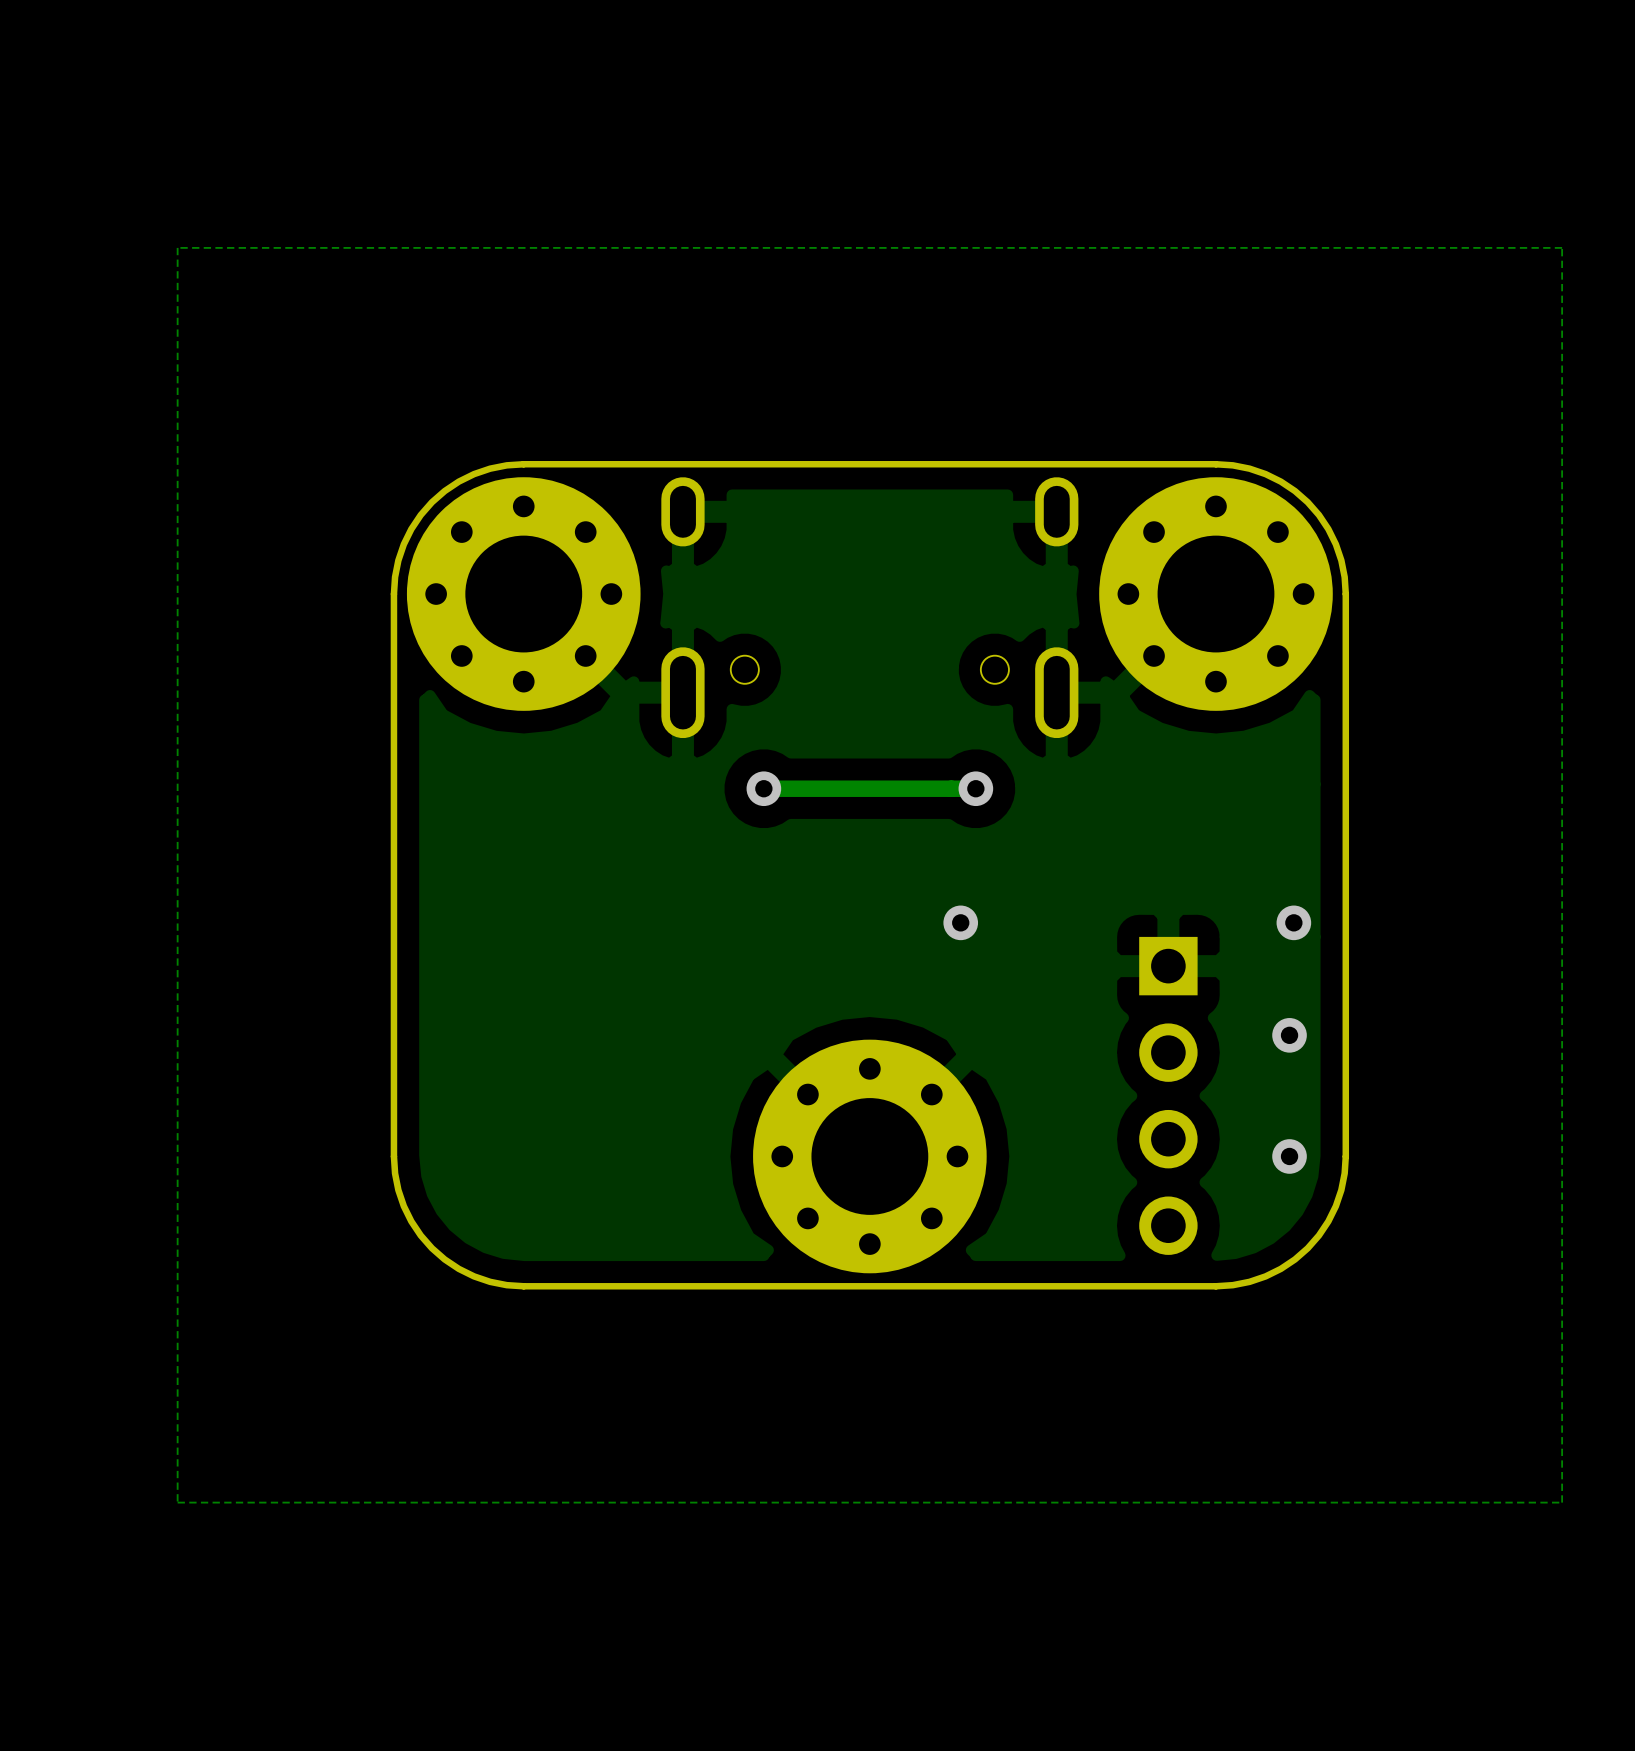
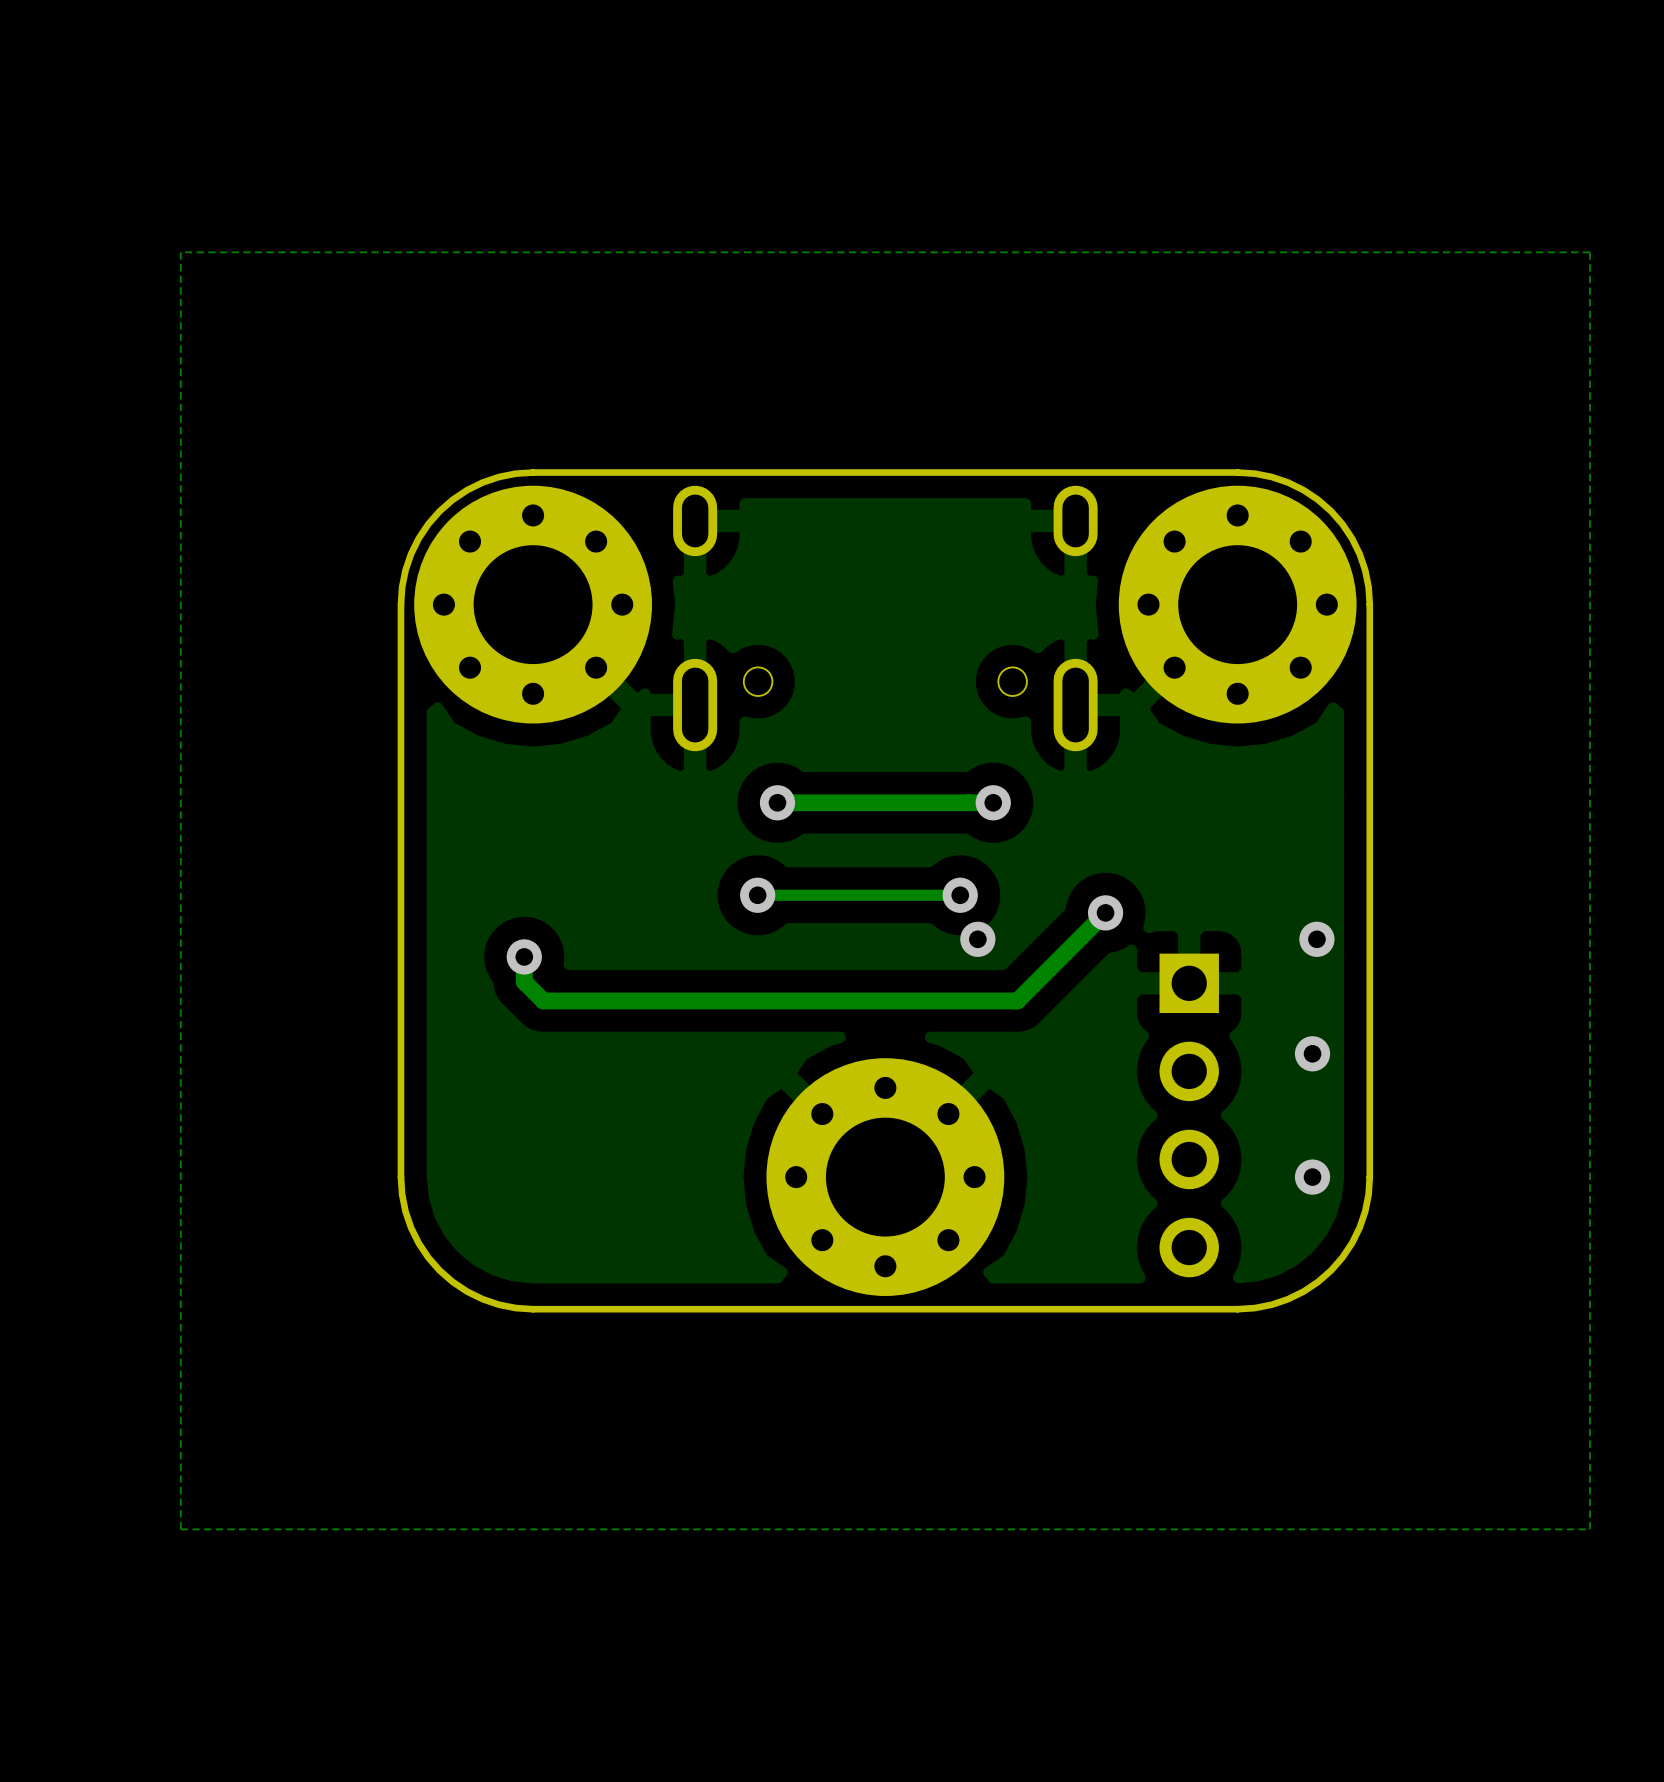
via: none -> (757, 895)
track: none -> (960, 895) (757, 895)
via: none -> (960, 895)
track: none -> (1105, 912) (1017, 1000) (543, 1000) (524, 981) (524, 956)
via: none -> (1105, 912)
via: none -> (524, 956)

